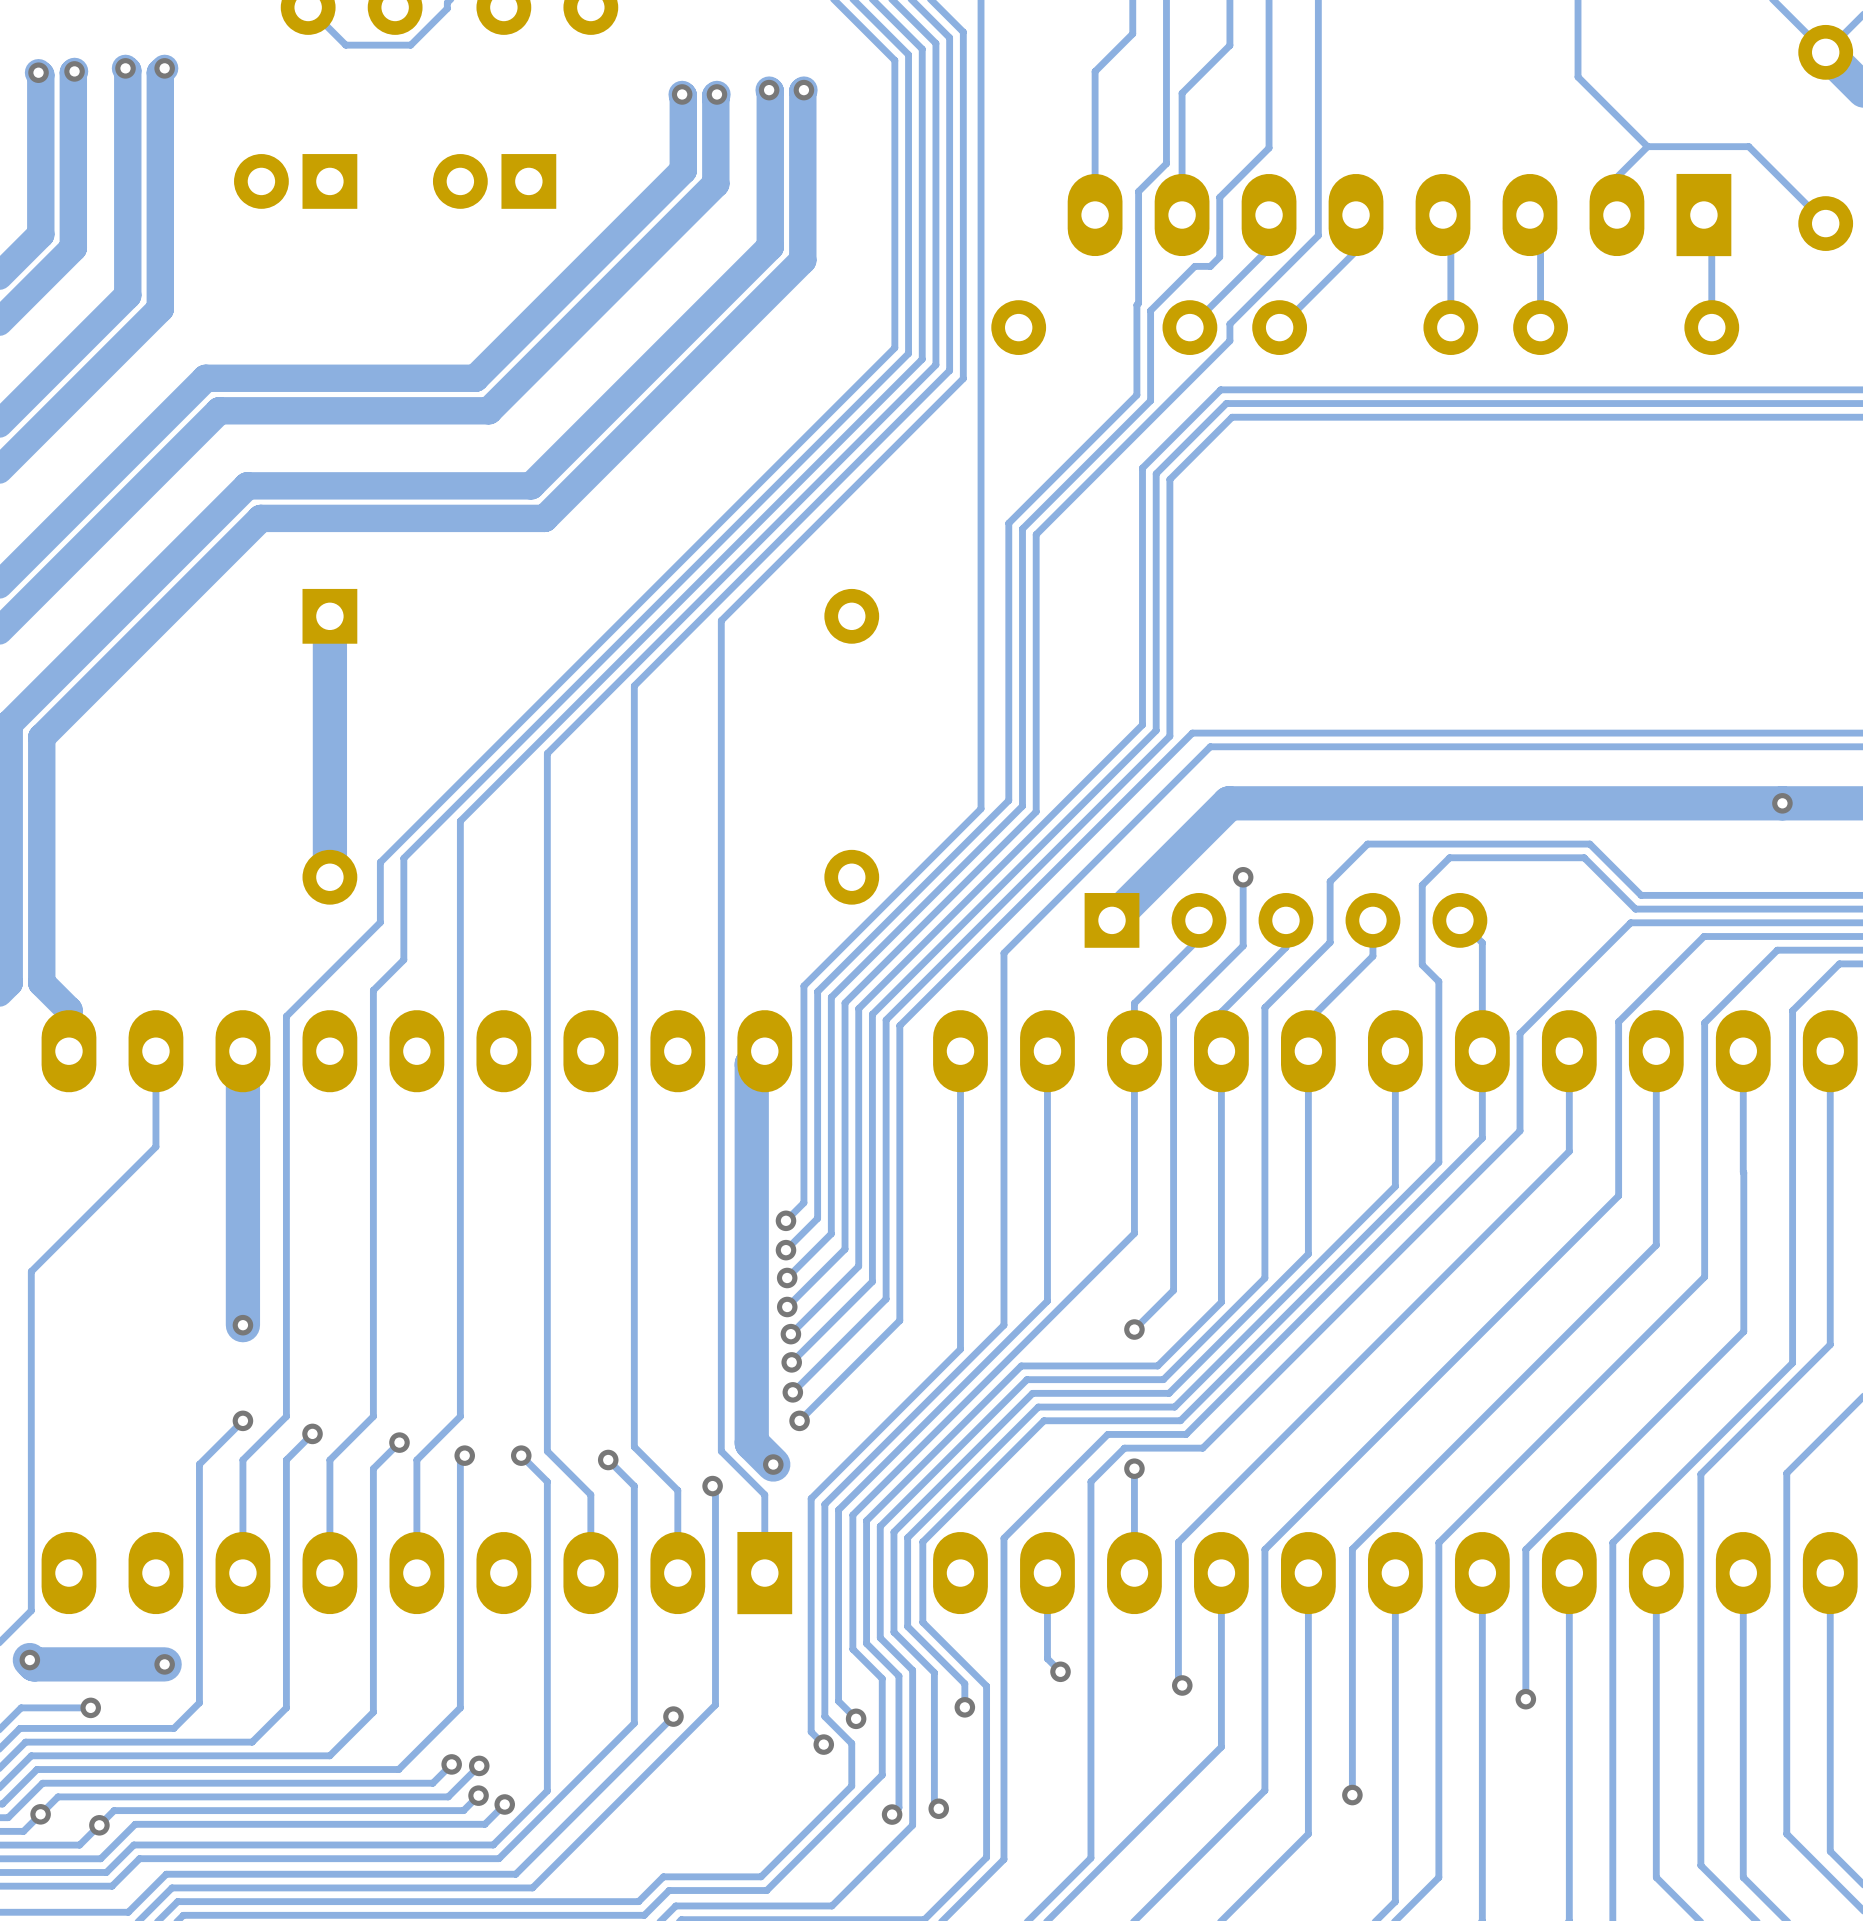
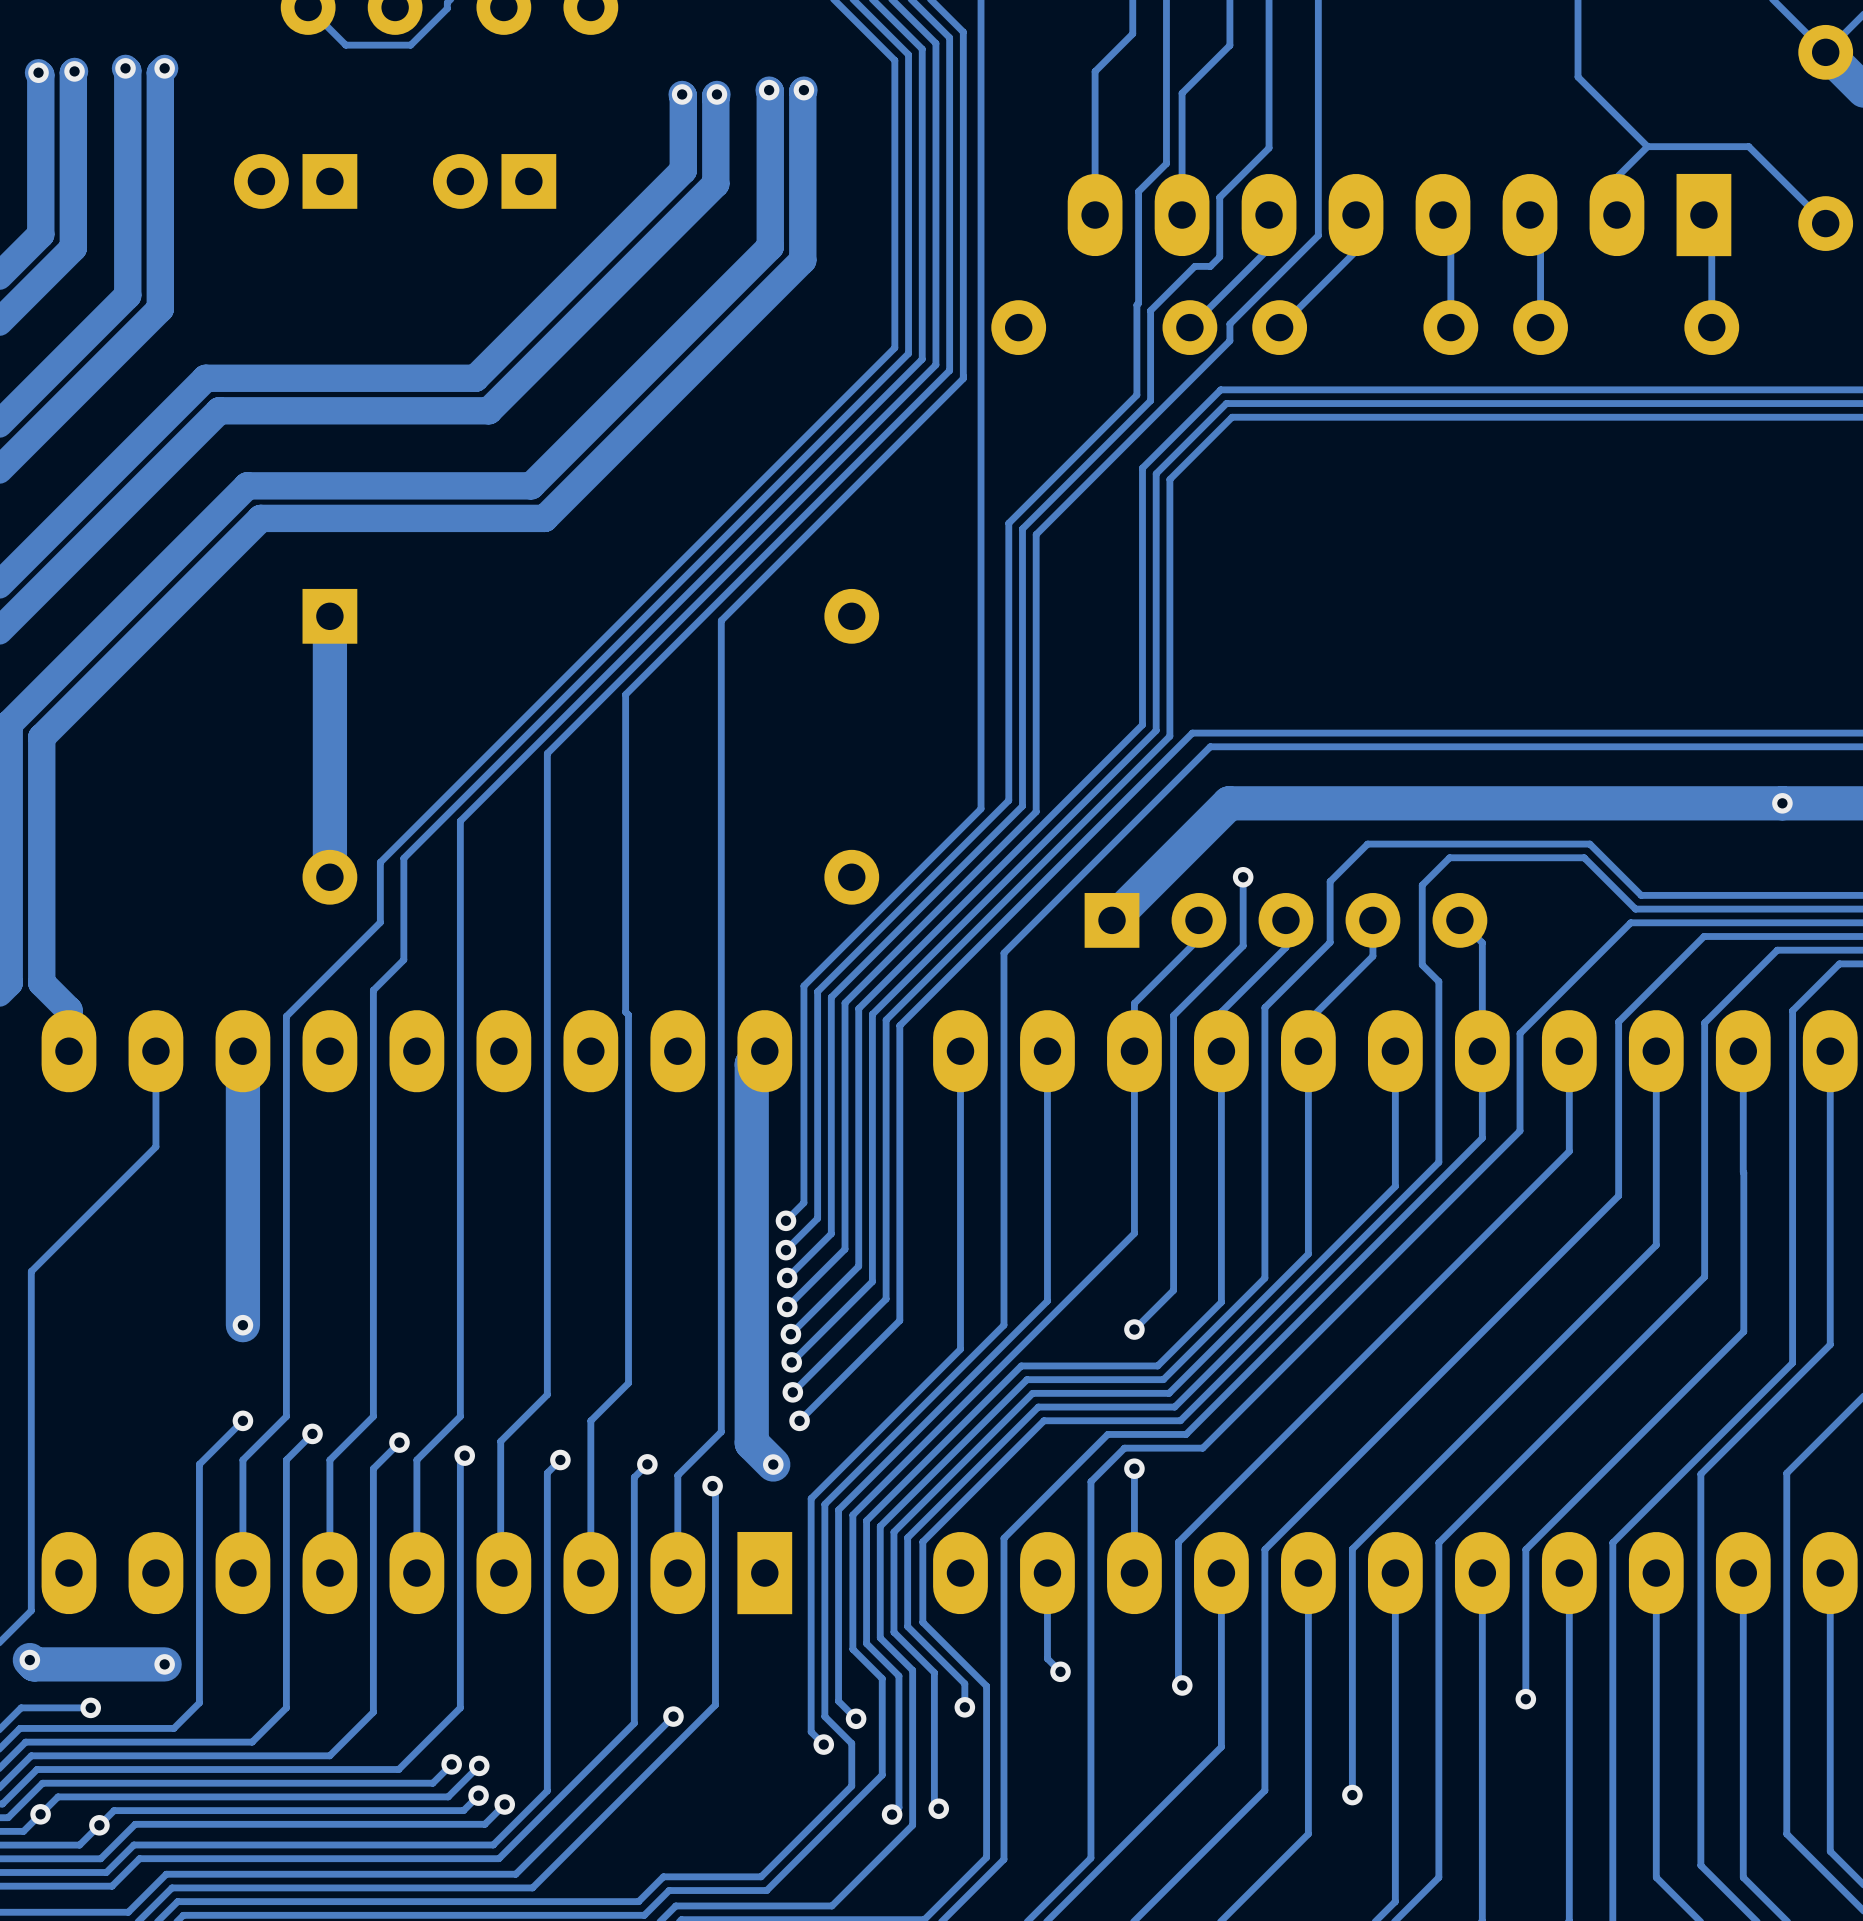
track: (634, 685) (634, 1446) (677, 1490) -> (634, 685) (625, 694) (625, 1012) (628, 1014) (628, 1383) (590, 1420) (590, 1494)
track: (547, 1394) (547, 1451) (590, 1494) -> (547, 1394) (500, 1441) (500, 1569) (503, 1573)
track: (721, 1431) (721, 1451) (764, 1494) (764, 1573) -> (721, 1431) (677, 1475) (677, 1490)
track: (521, 1455) (547, 1481) -> (560, 1460) (547, 1473) (547, 1481)
via: (521, 1455) -> none
via: none -> (560, 1460)
track: (608, 1460) (634, 1486) -> (647, 1464) (634, 1477) (634, 1486)
via: (608, 1460) -> none
via: none -> (647, 1464)

